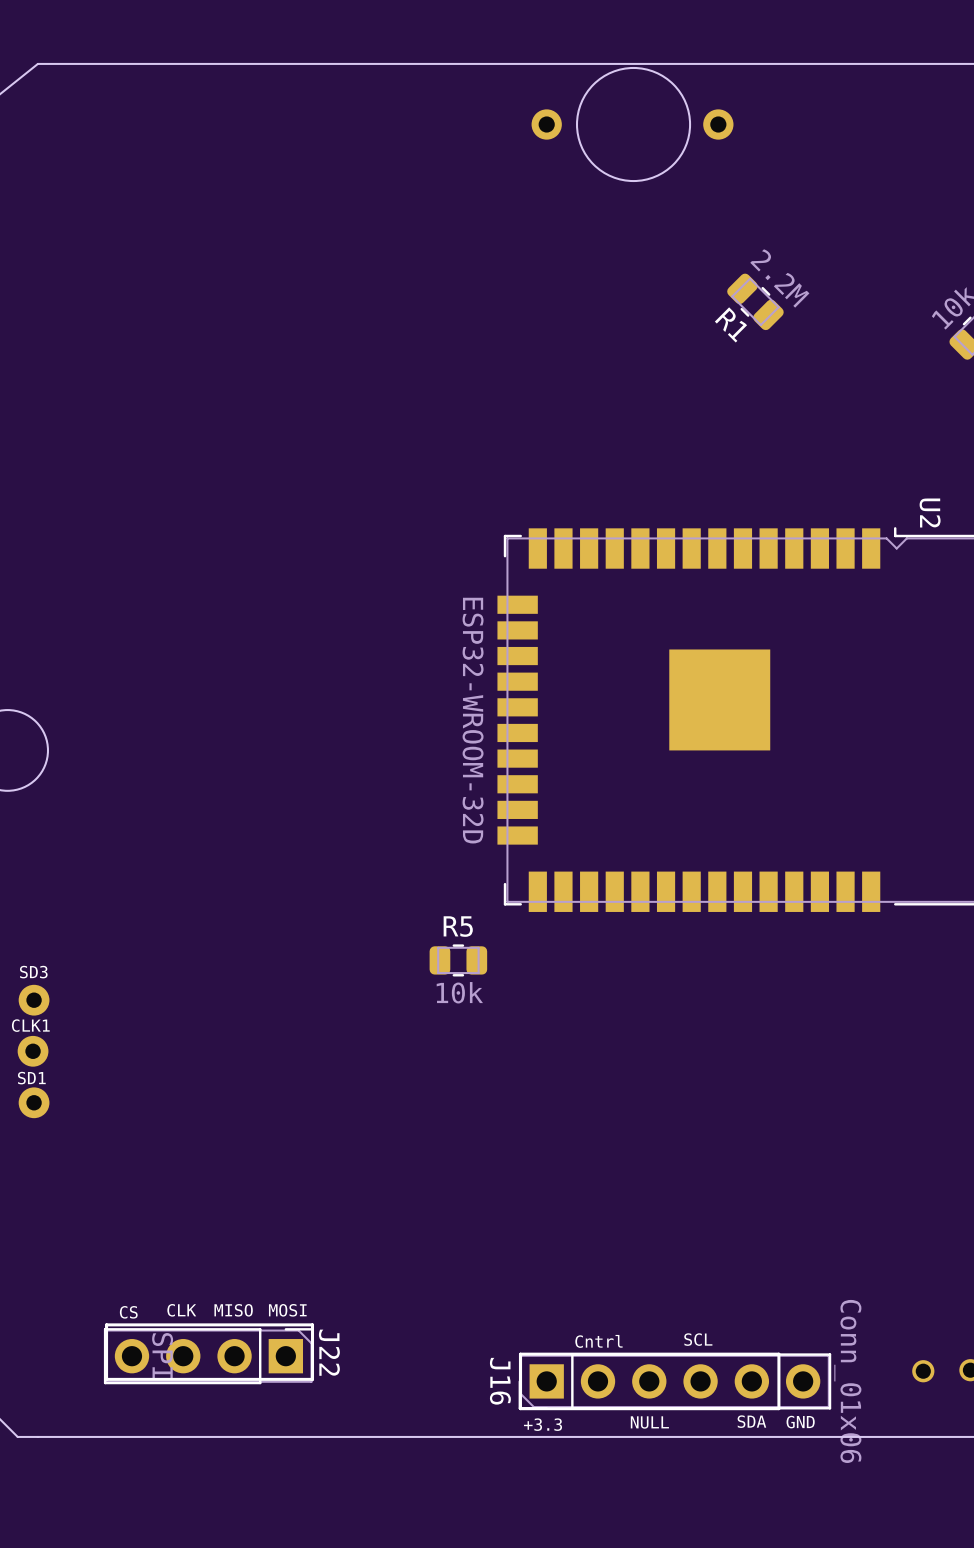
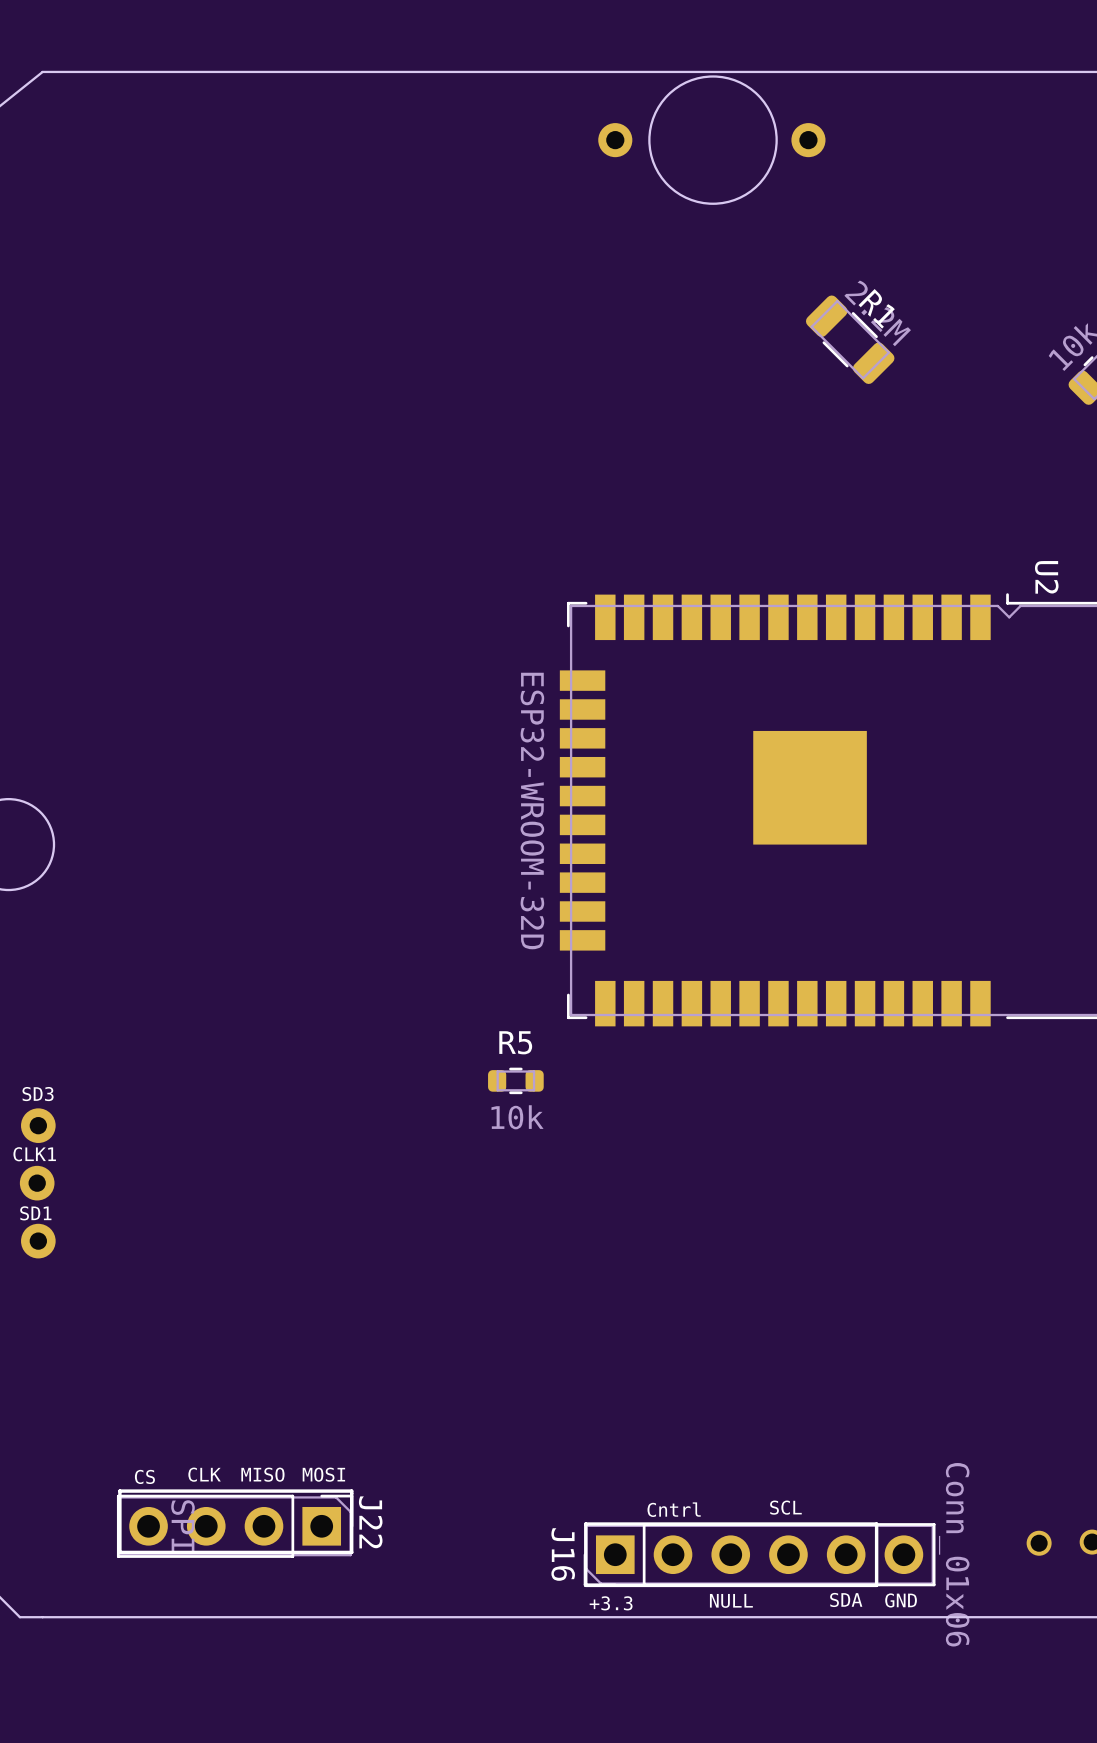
R1 footprint: [727, 273, 784, 331] -> [805, 295, 895, 384]
R1 name position: R1 (730, 324) -> R1 (876, 308)
R5 footprint: [429, 944, 488, 977] -> [488, 1067, 544, 1095]

